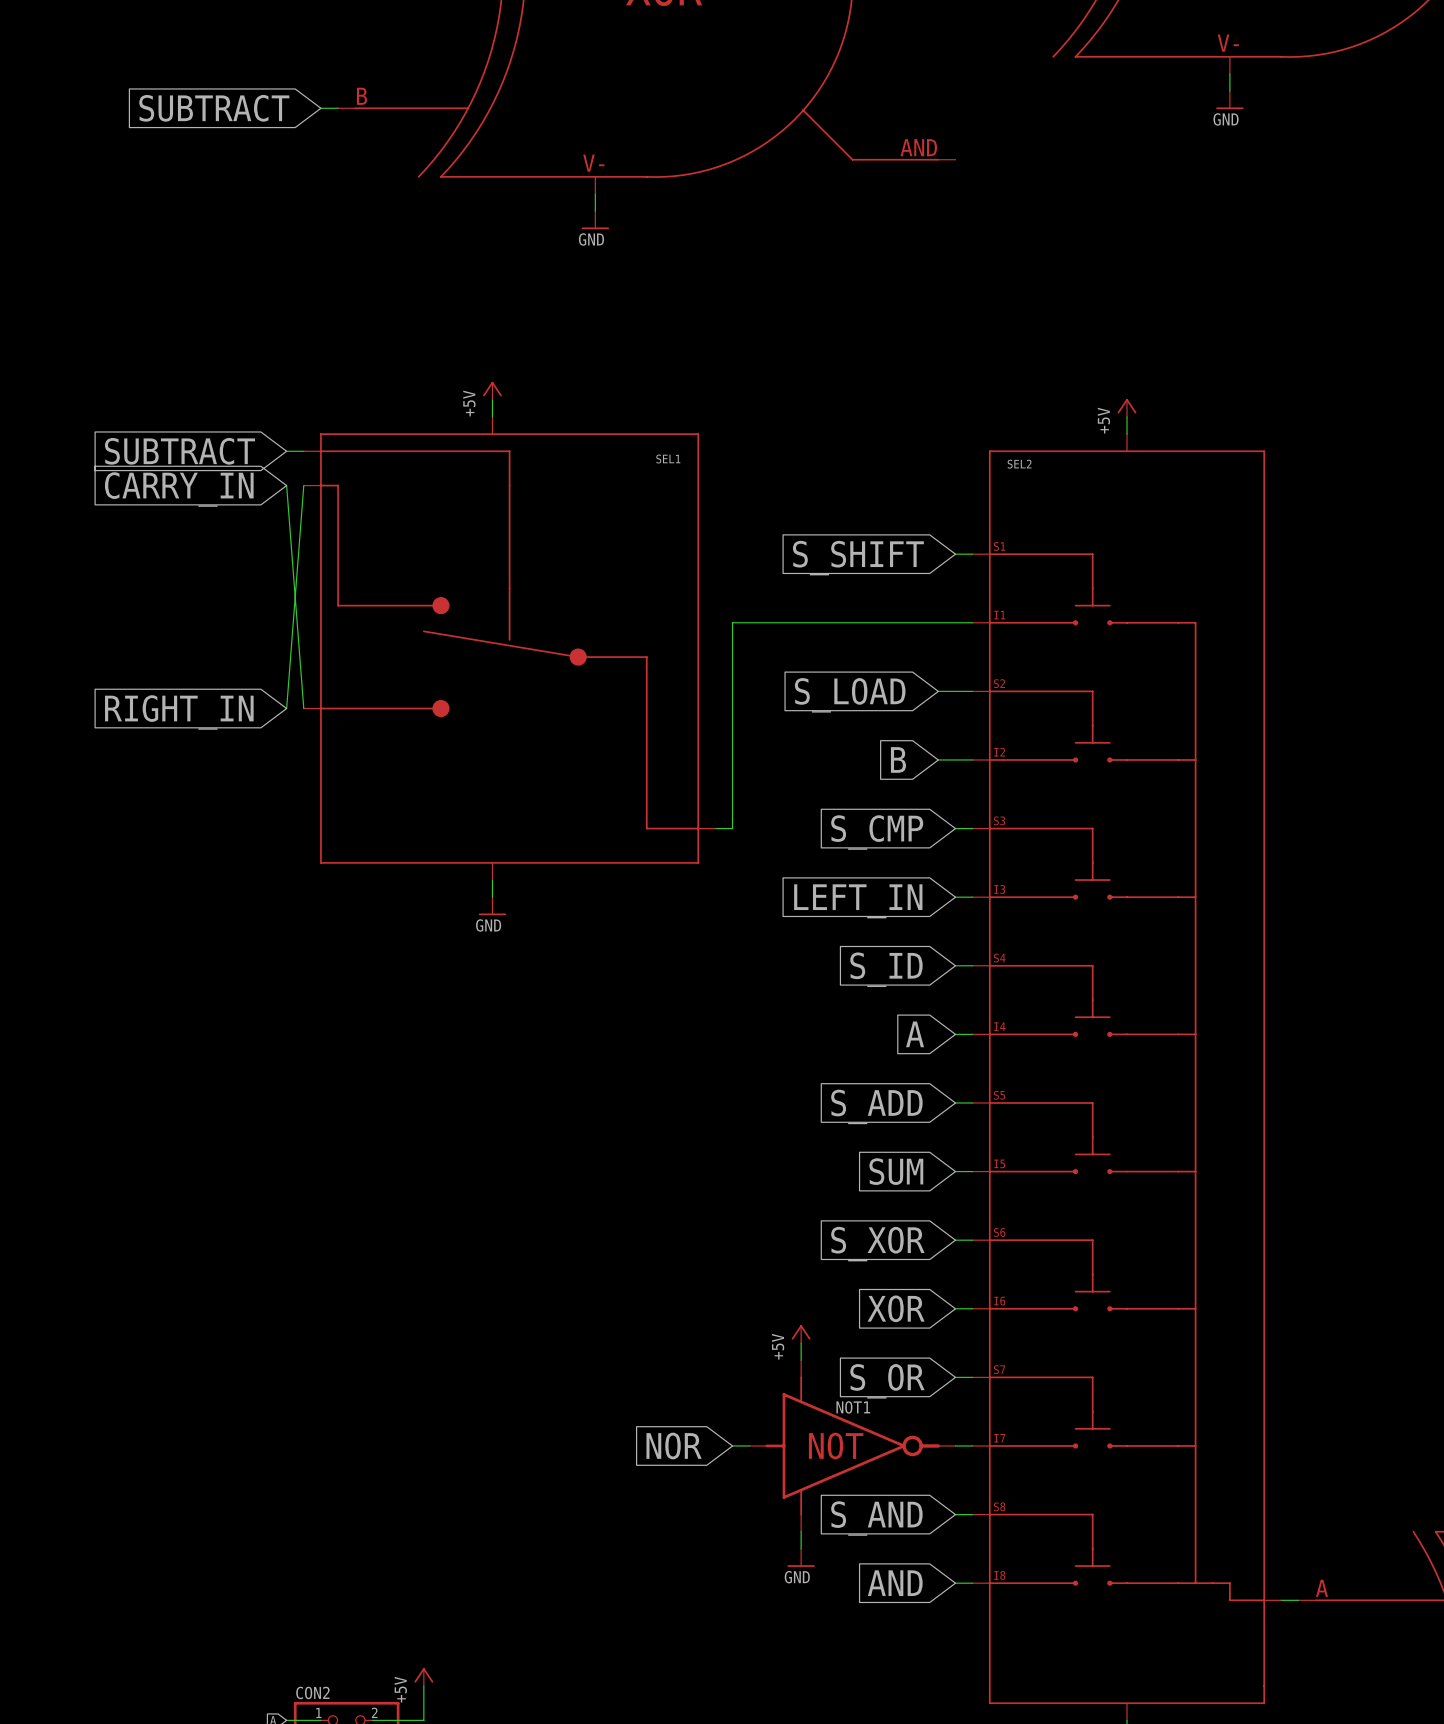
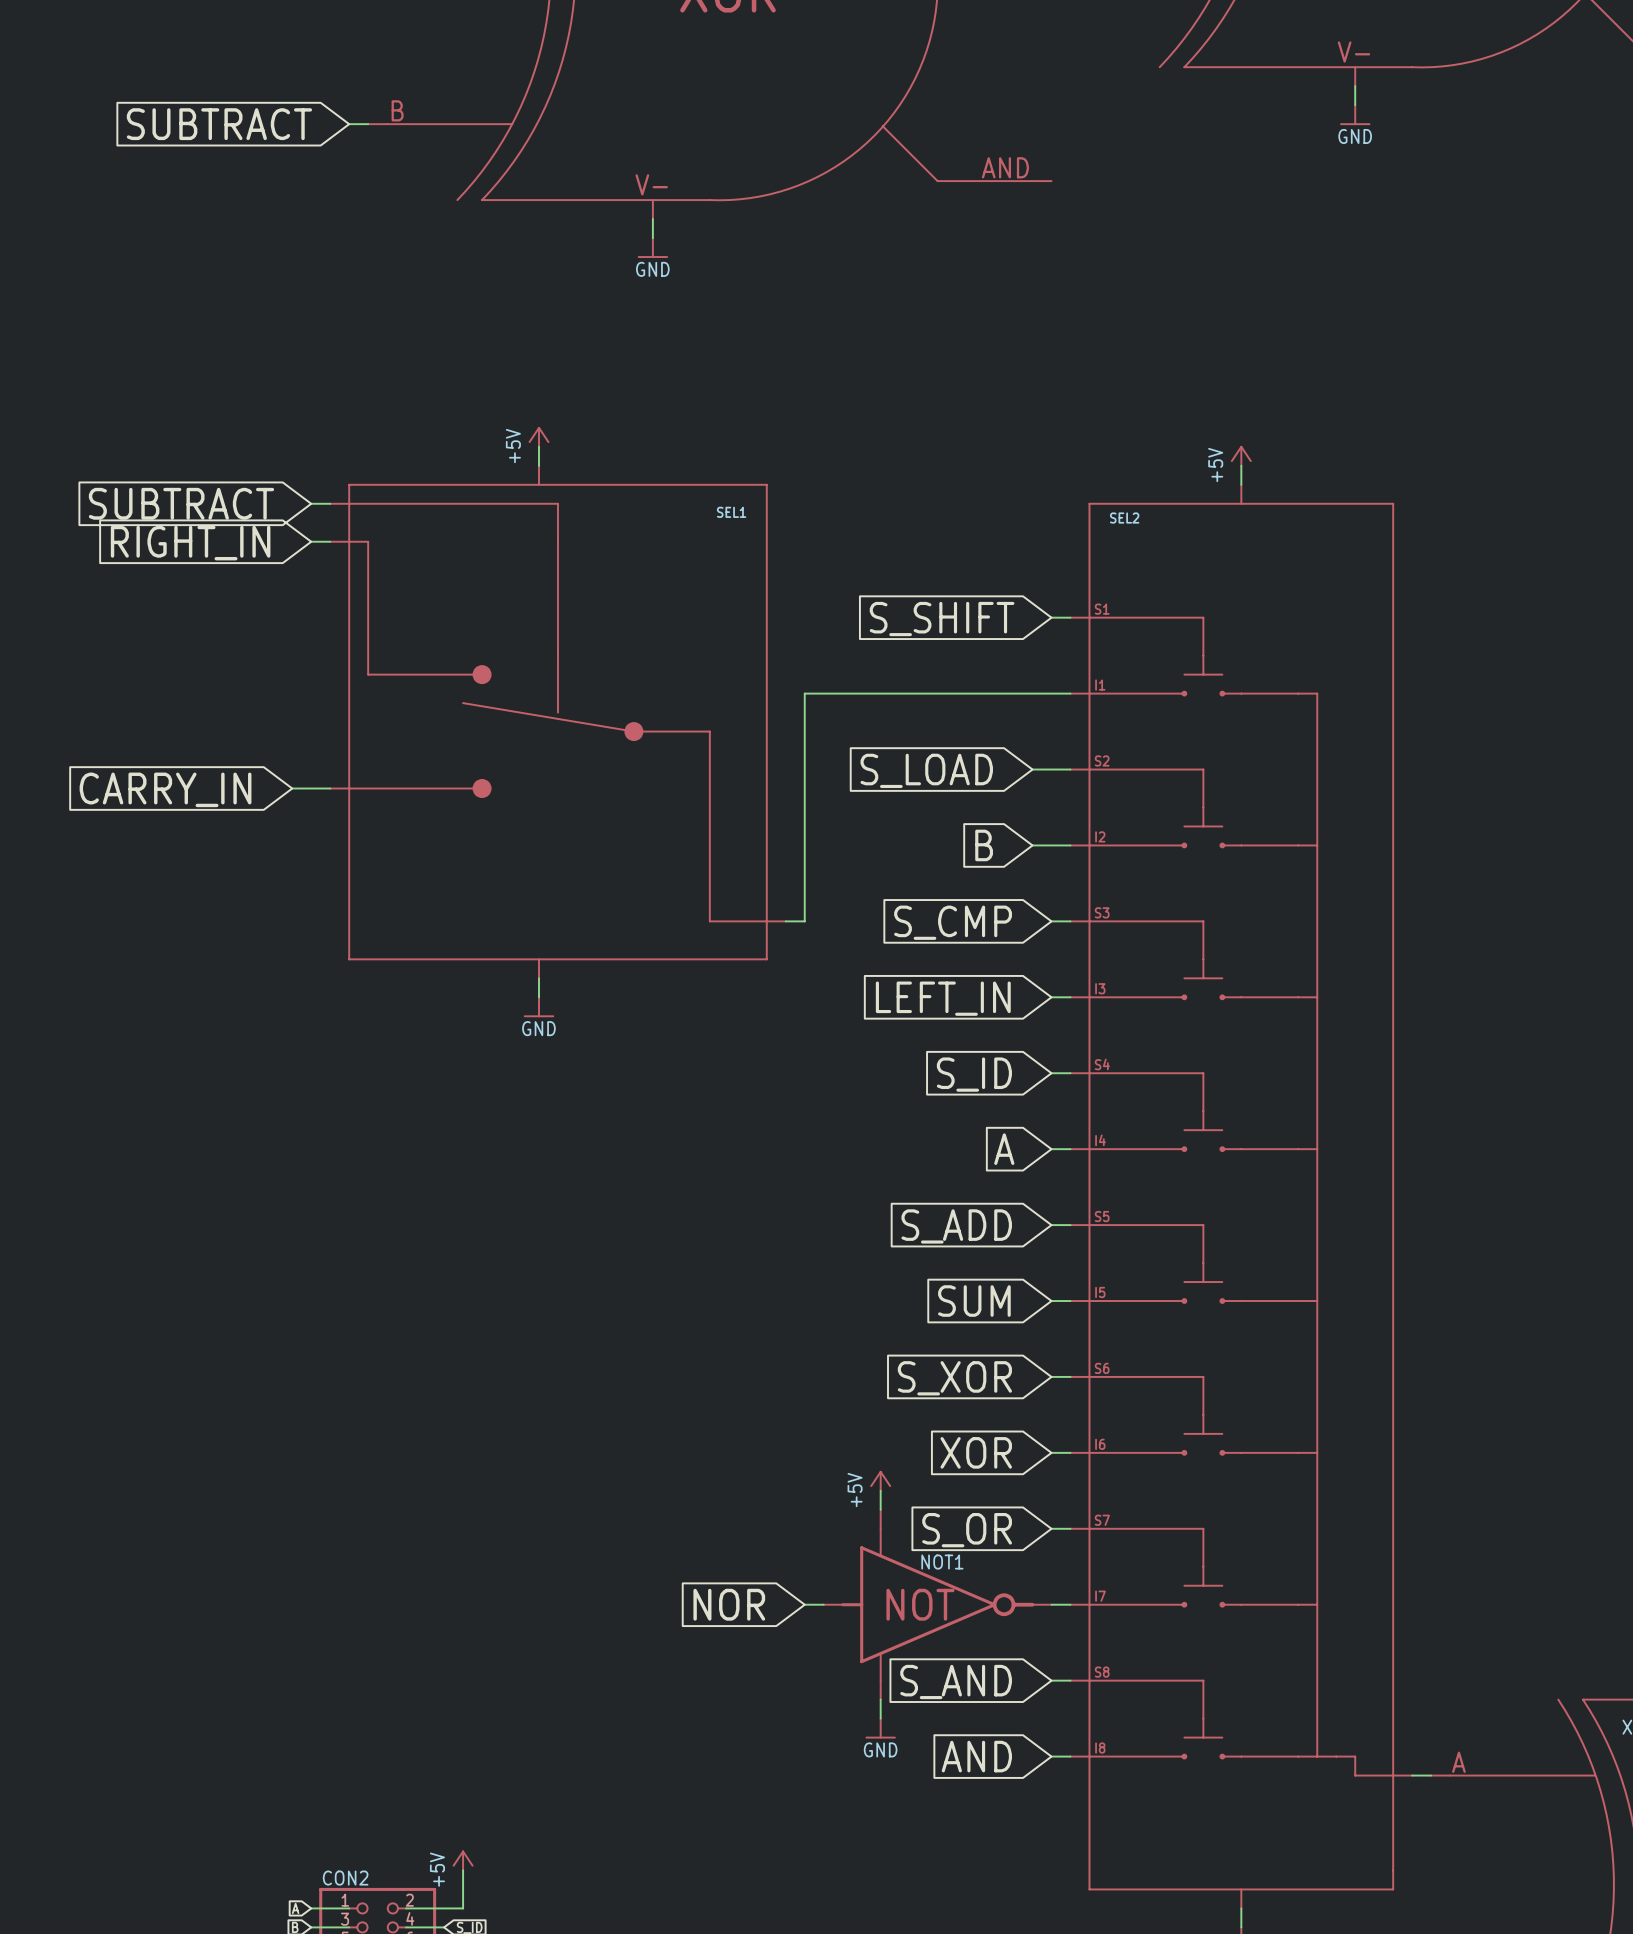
wire: (286, 485) (303, 708) -> (311, 541) (330, 541)
wire: (303, 485) (286, 708) -> none
global label: CARRY_IN (179, 489) -> RIGHT_IN (190, 543)
wire: none -> (292, 788) (330, 788)
global label: none -> CARRY_IN (165, 789)
global label: RIGHT_IN (179, 712) -> none

